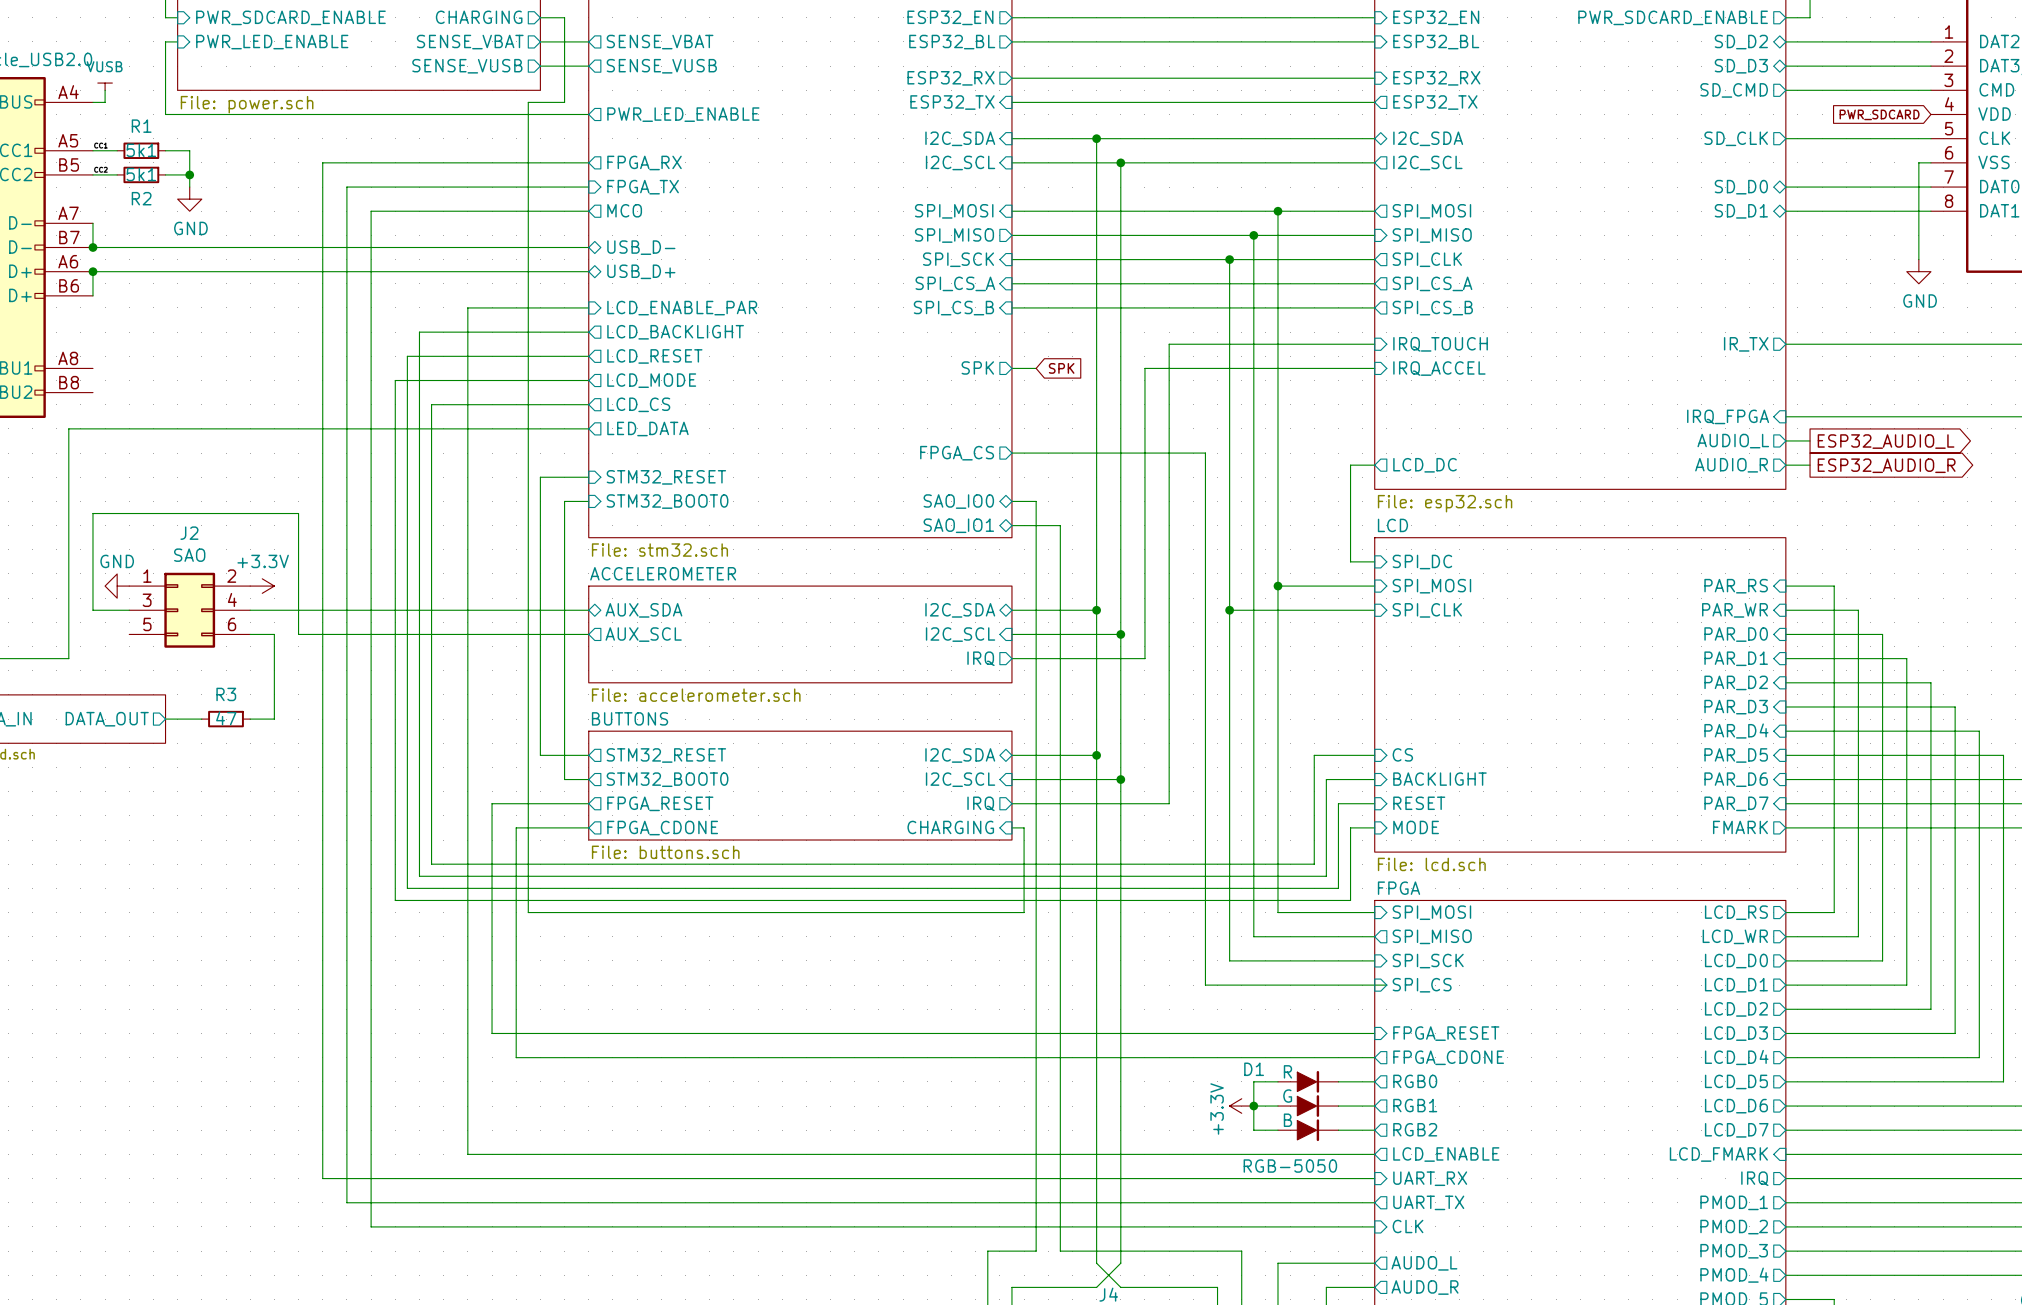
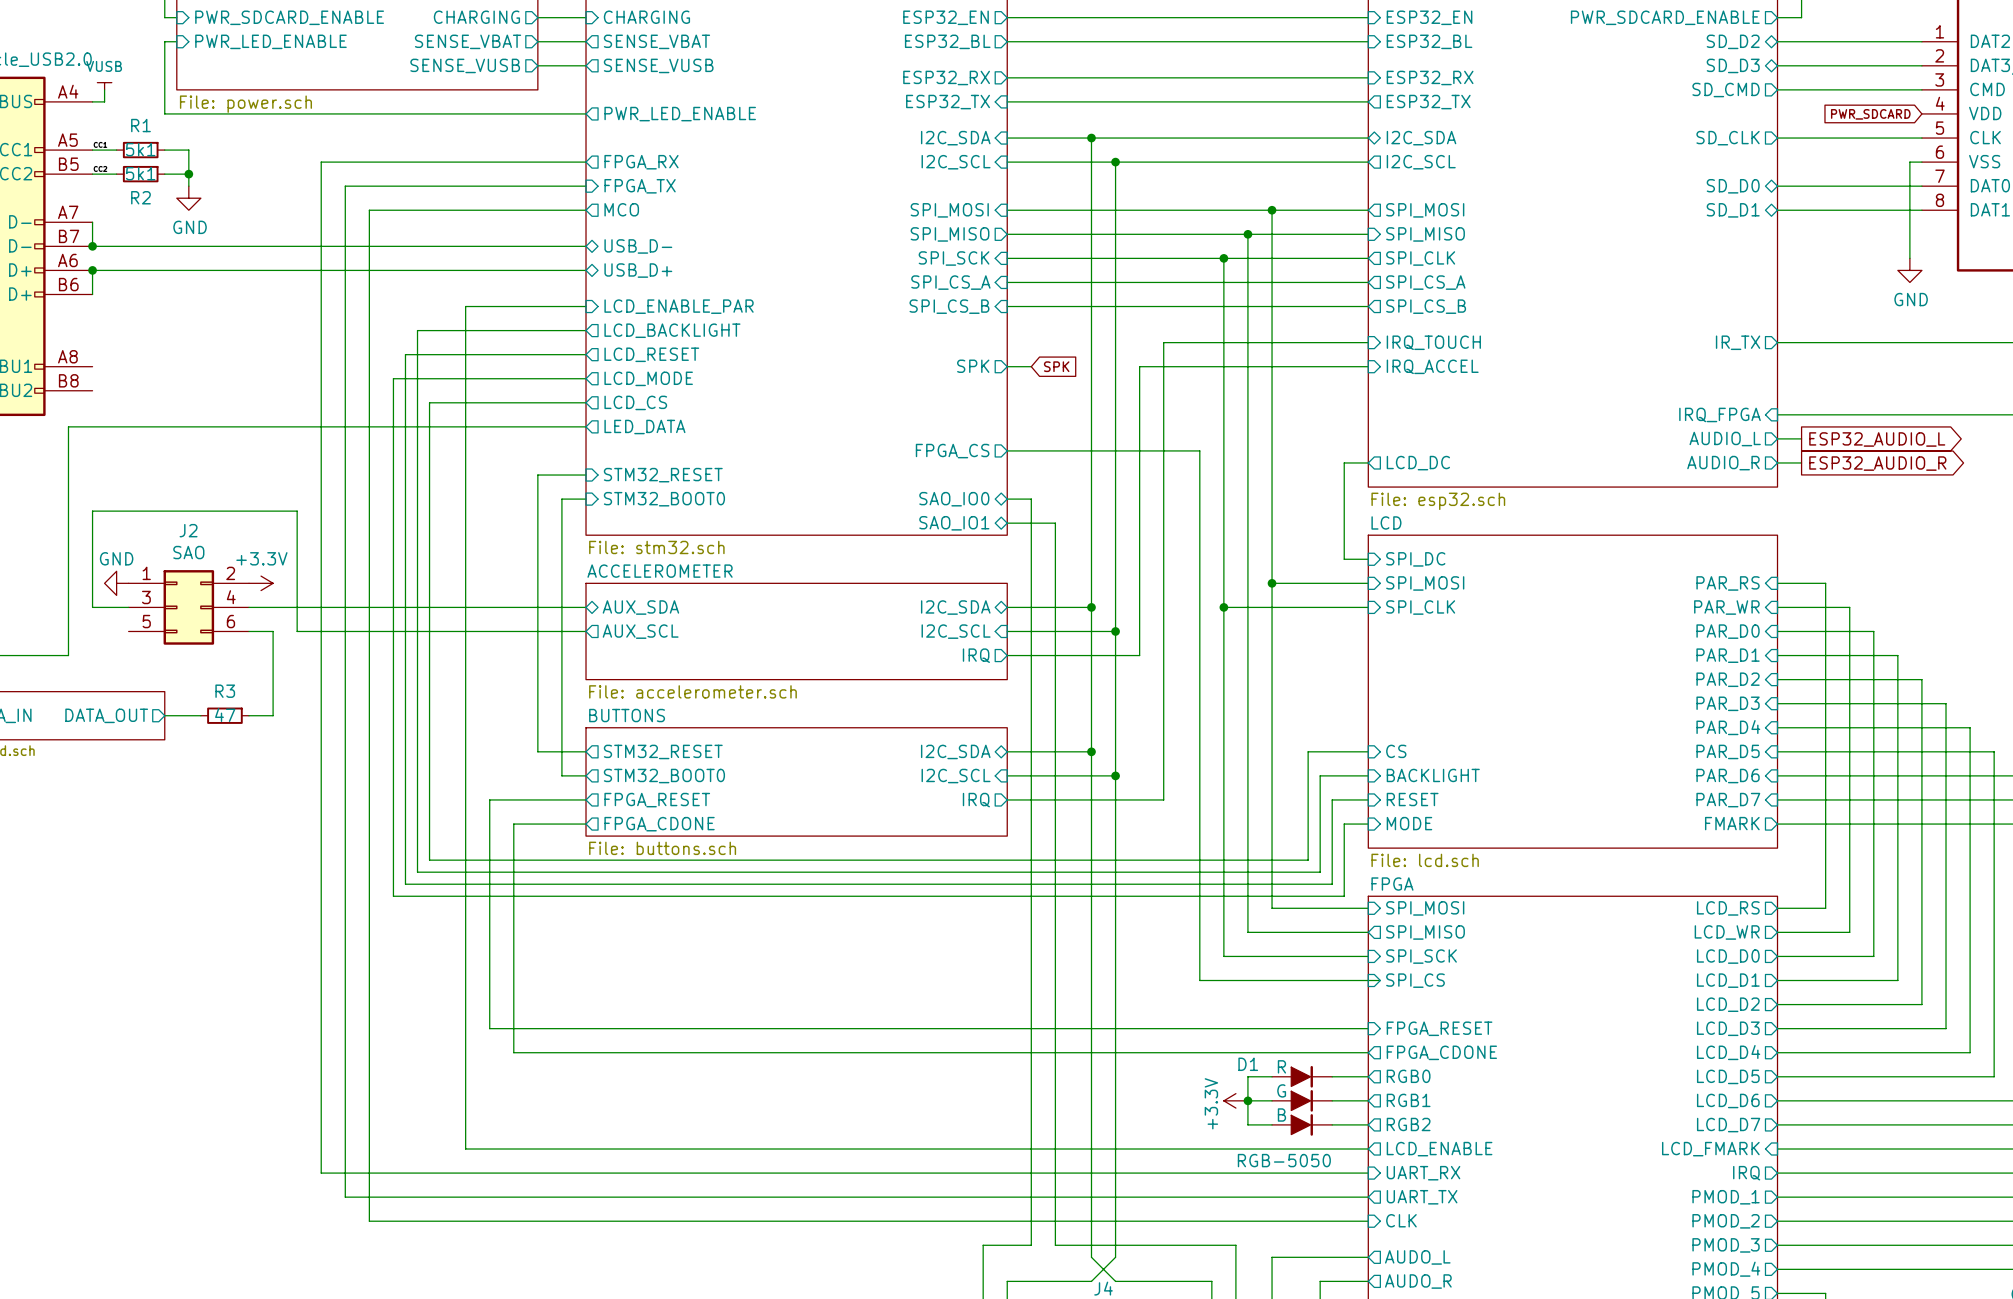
wire: (564, 17) (564, 102) (528, 102) (528, 912) (1024, 912) (1024, 827) (1011, 827) -> (561, 17) (586, 17)
sheet pin: none -> CHARGING (646, 17)
sheet pin: CHARGING (950, 827) -> none

